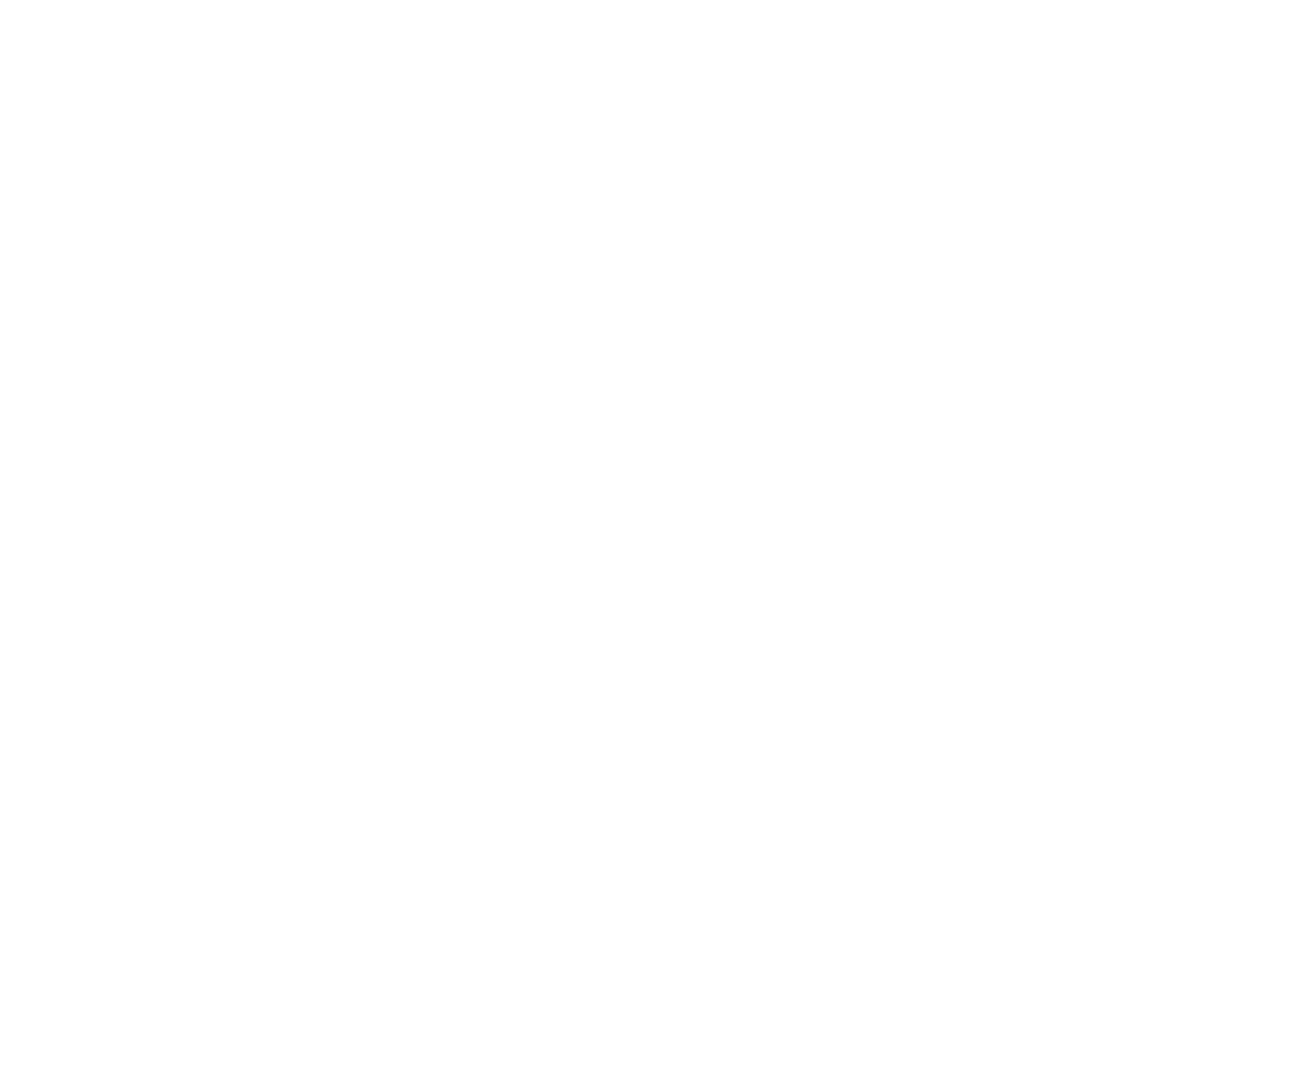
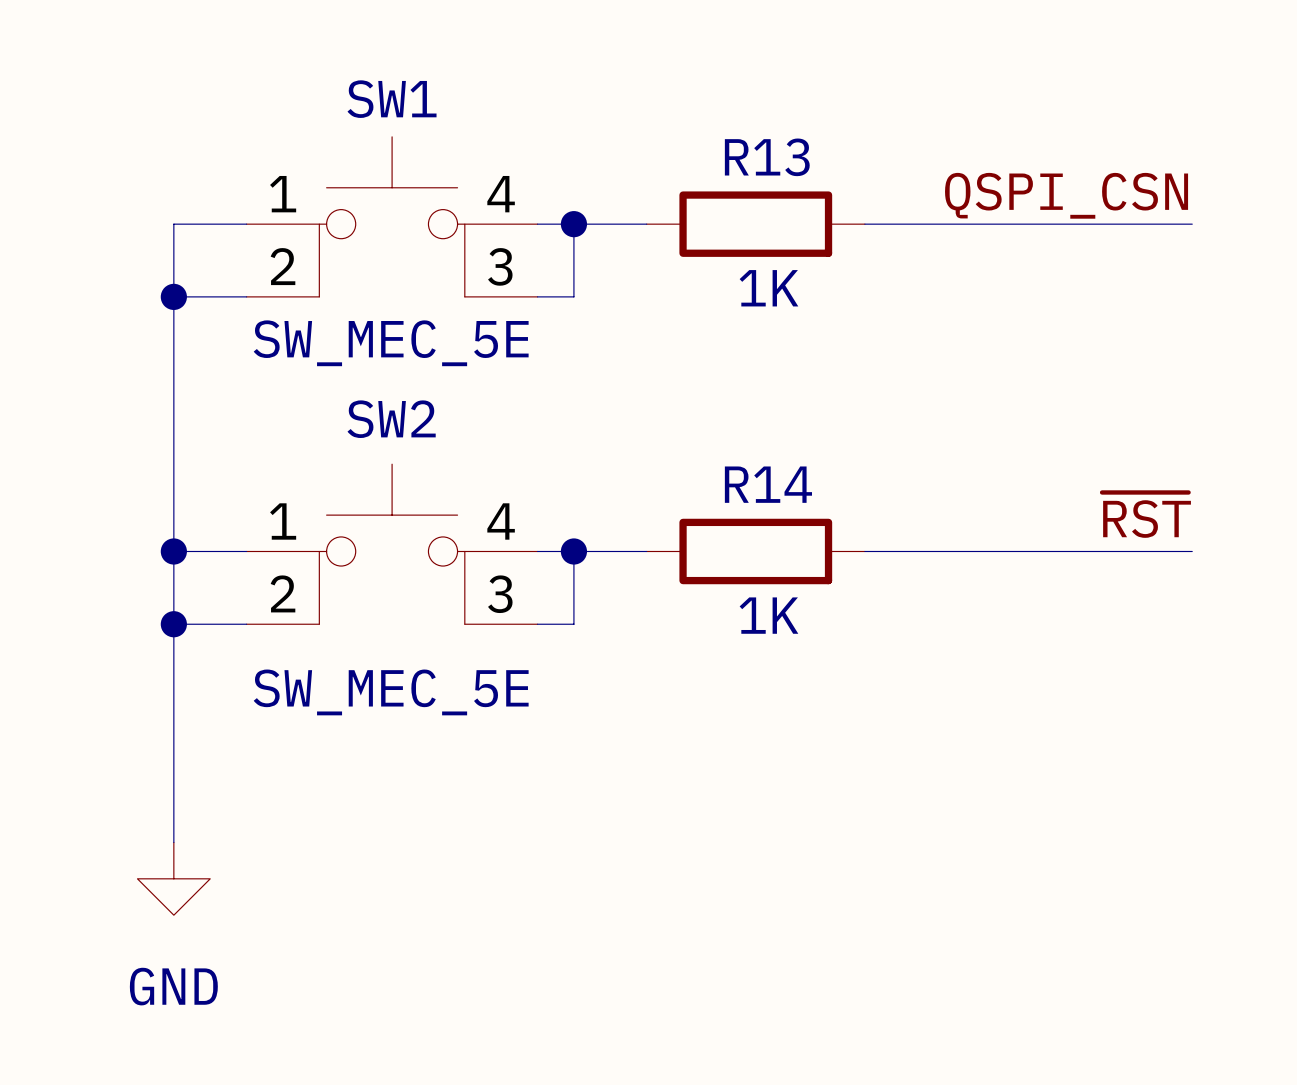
label: none -> QSPI_CSN (1066, 195)
SW1: none -> SW_MEC_5E (392, 216)
wire: none -> (246, 224) (173, 224) (173, 842)
wire: none -> (537, 224) (646, 224)
wire: none -> (573, 224) (573, 296) (537, 296)
junction: none -> (573, 224)
R13: none -> 1K (755, 224)
wire: none -> (864, 224) (1192, 224)
wire: none -> (173, 296) (246, 296)
junction: none -> (173, 296)
label: none -> ~{RST} (1146, 515)
SW2: none -> SW_MEC_5E (392, 544)
wire: none -> (173, 551) (246, 551)
junction: none -> (173, 551)
wire: none -> (537, 551) (646, 551)
wire: none -> (573, 551) (573, 624) (537, 624)
junction: none -> (573, 551)
R14: none -> 1K (755, 551)
wire: none -> (864, 551) (1192, 551)
wire: none -> (173, 624) (246, 624)
junction: none -> (173, 624)
power symbol: none -> GND (173, 878)

